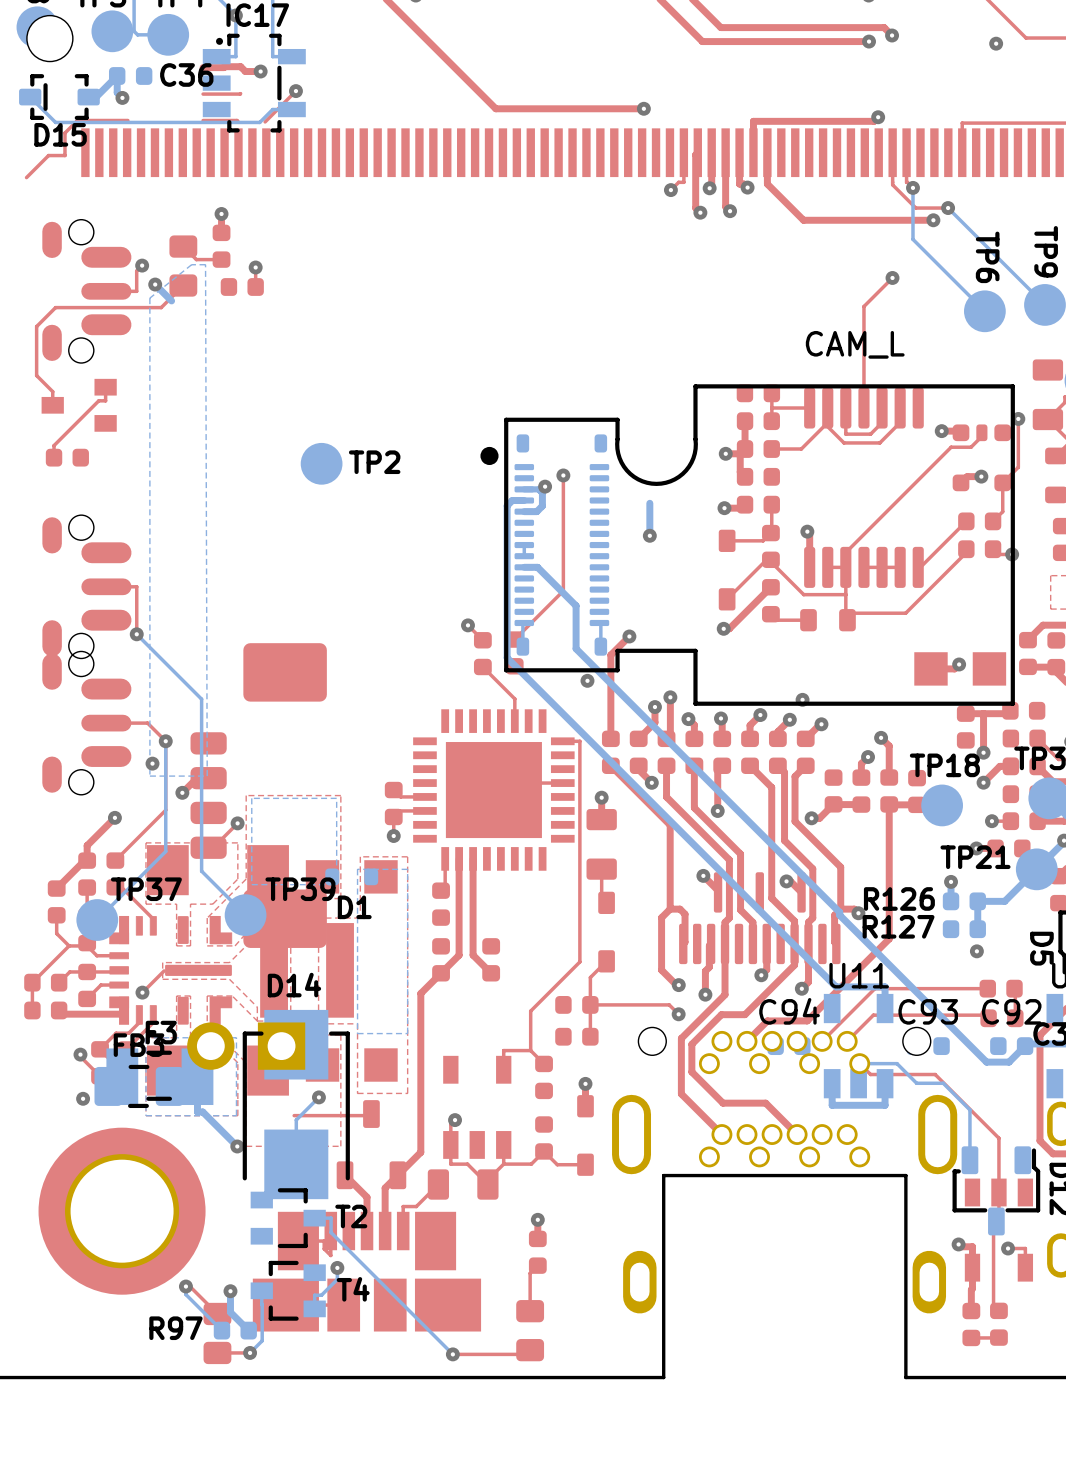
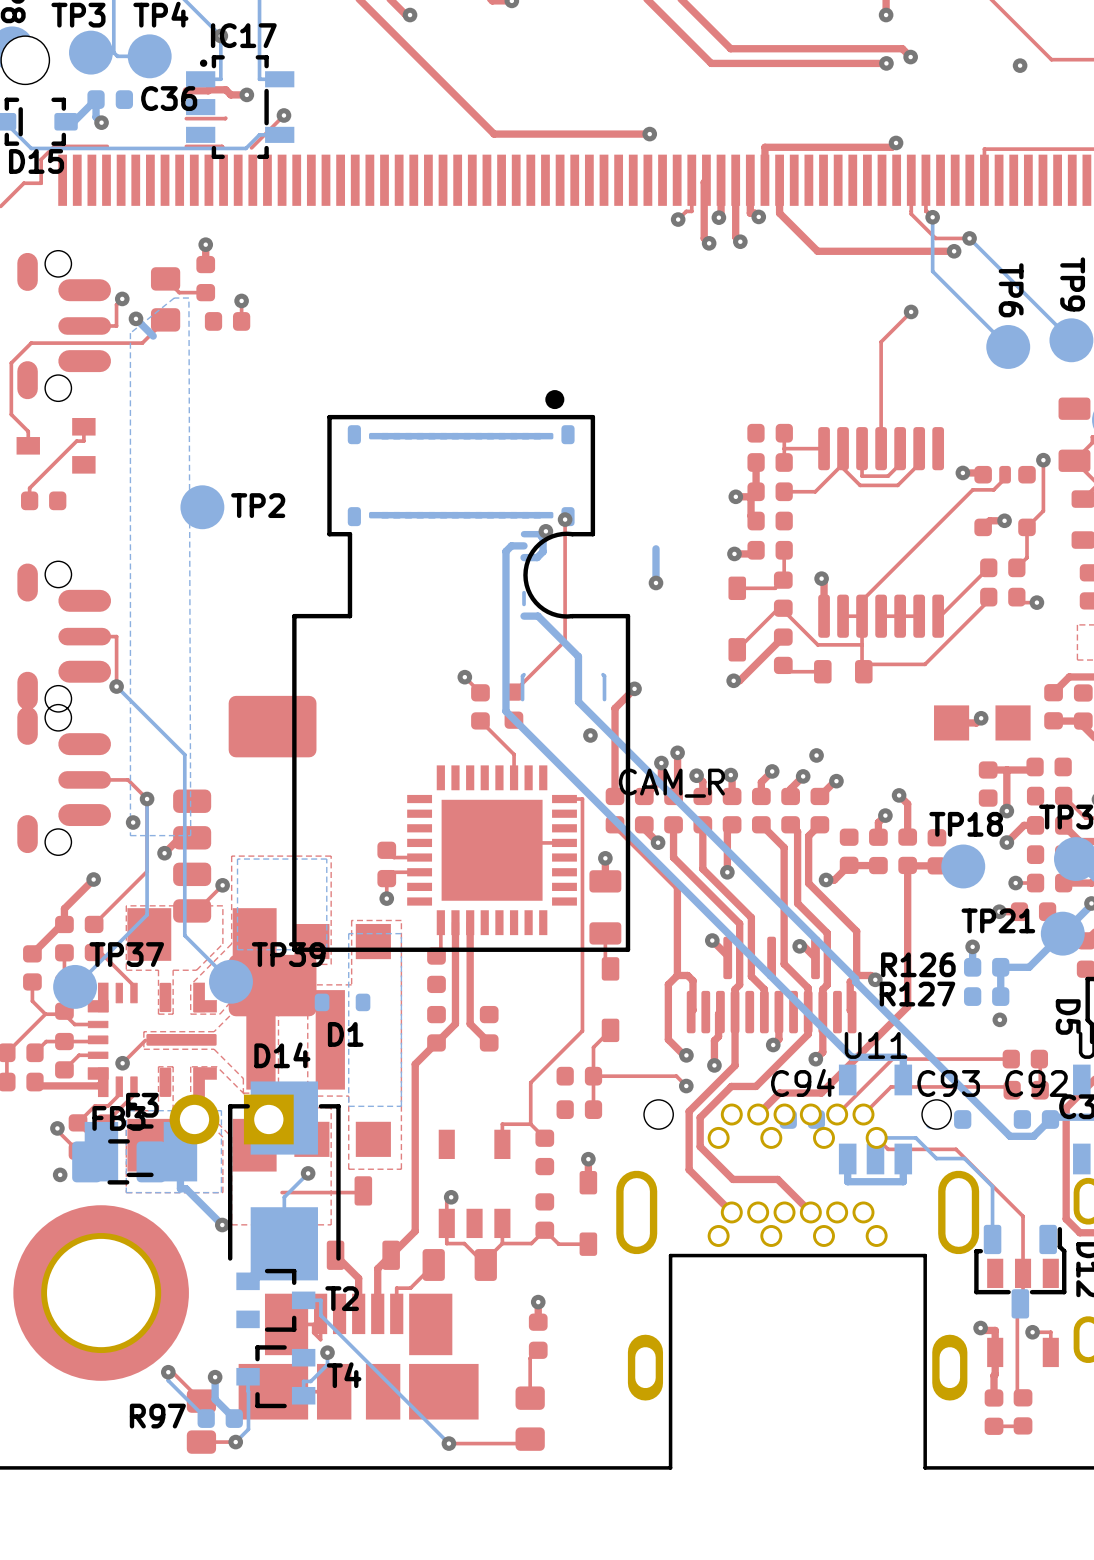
TP2 position: (321, 463) -> (202, 507)
CAM_L: (747, 545) -> none
CAM_R: none -> (461, 671)
D1 position: (351, 876) -> (342, 1002)

